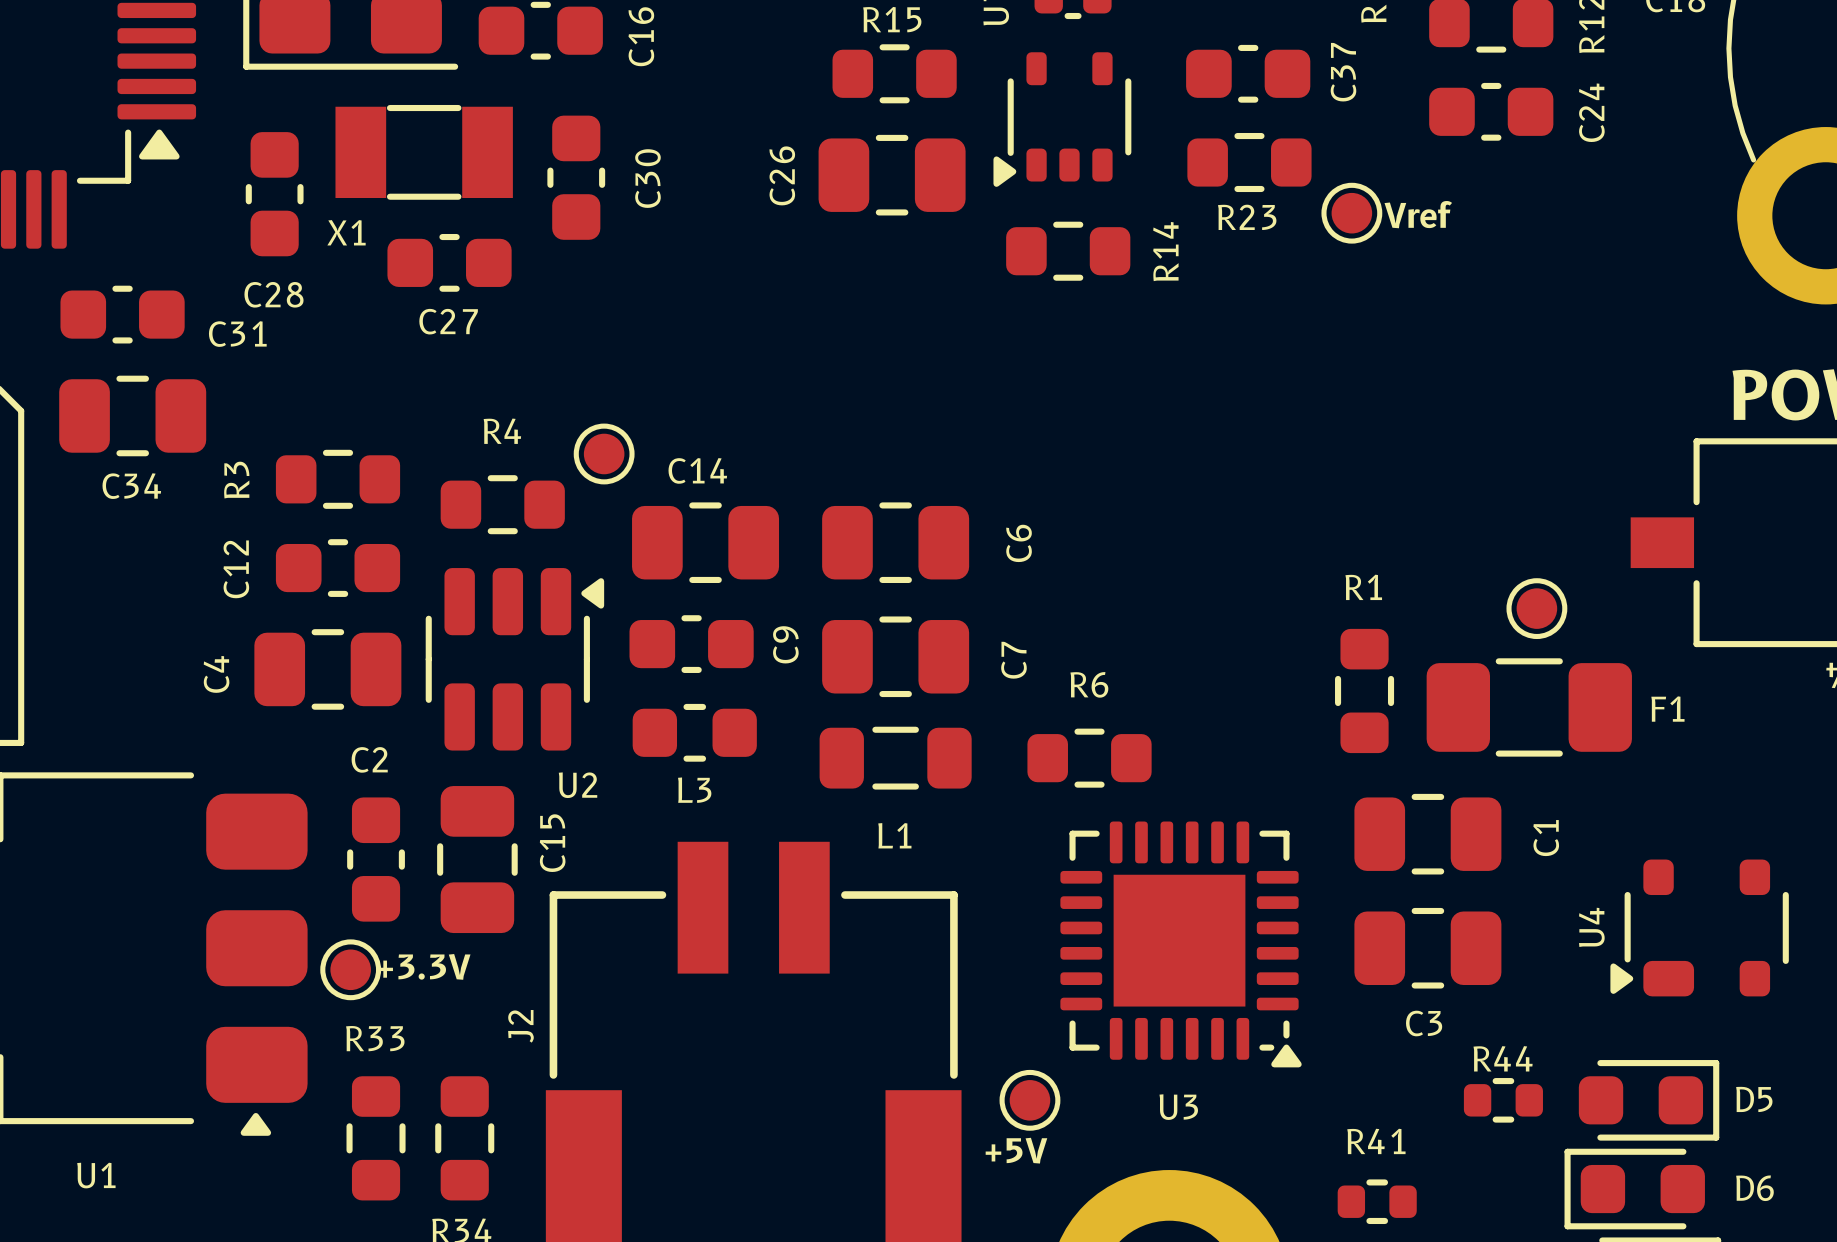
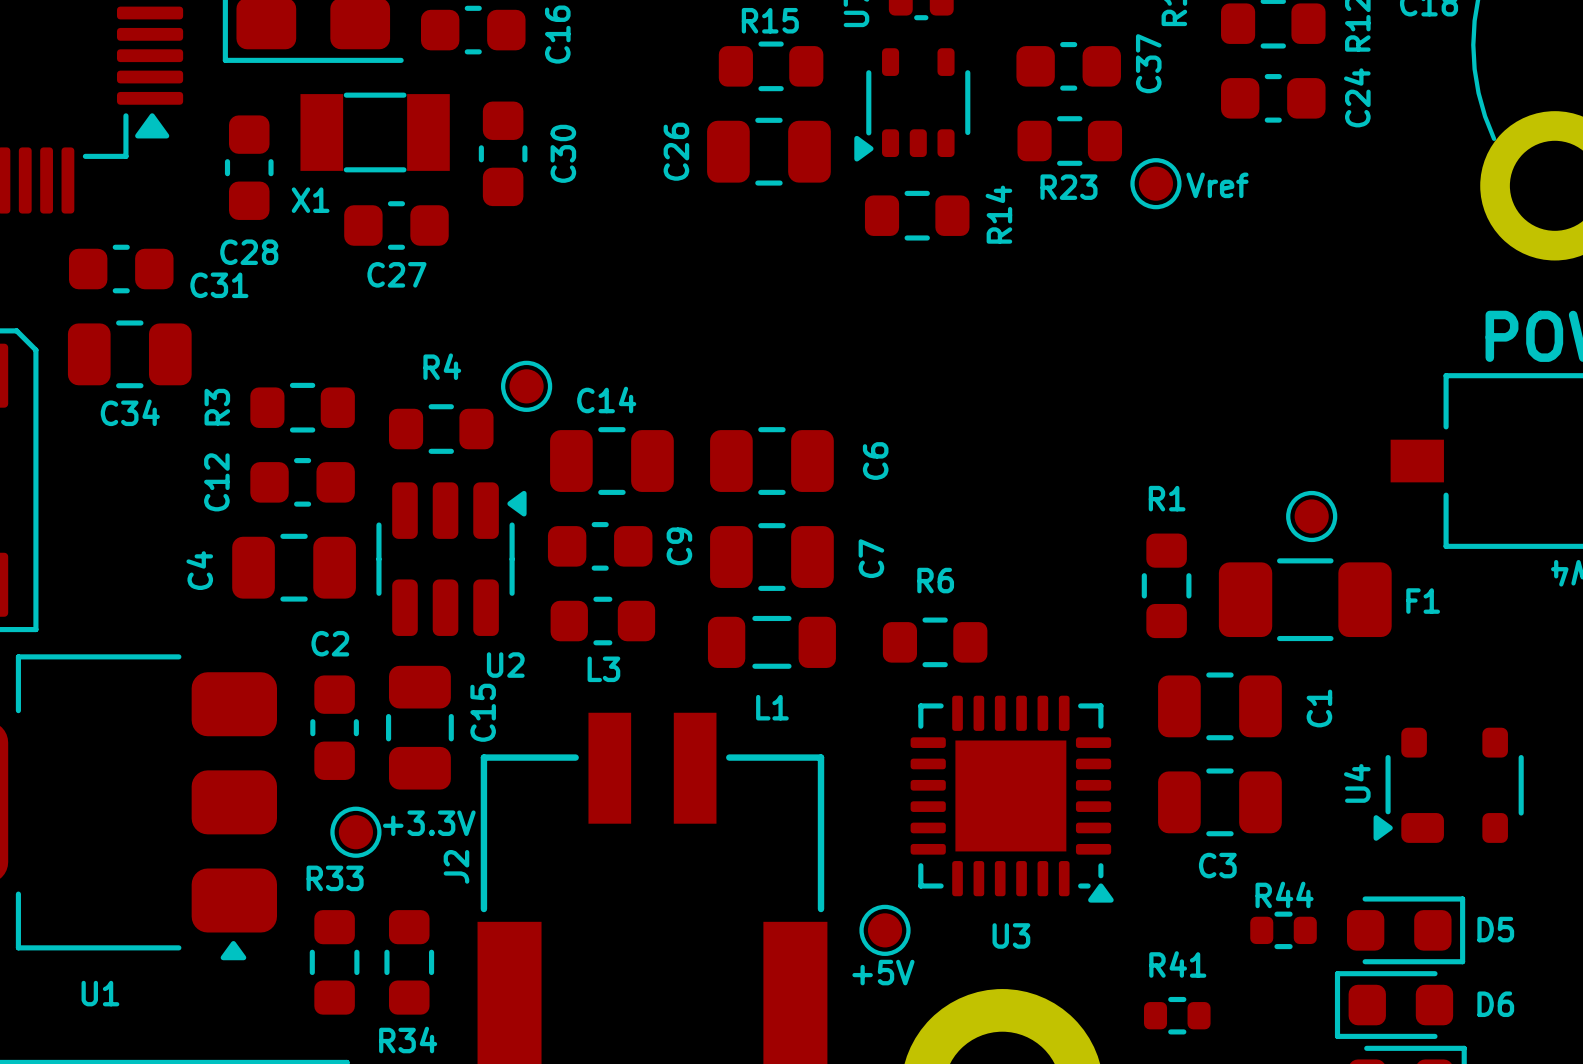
text position: +3.3V (423, 966) -> +3.3V (429, 823)
part position: (350, 969) -> (355, 832)

